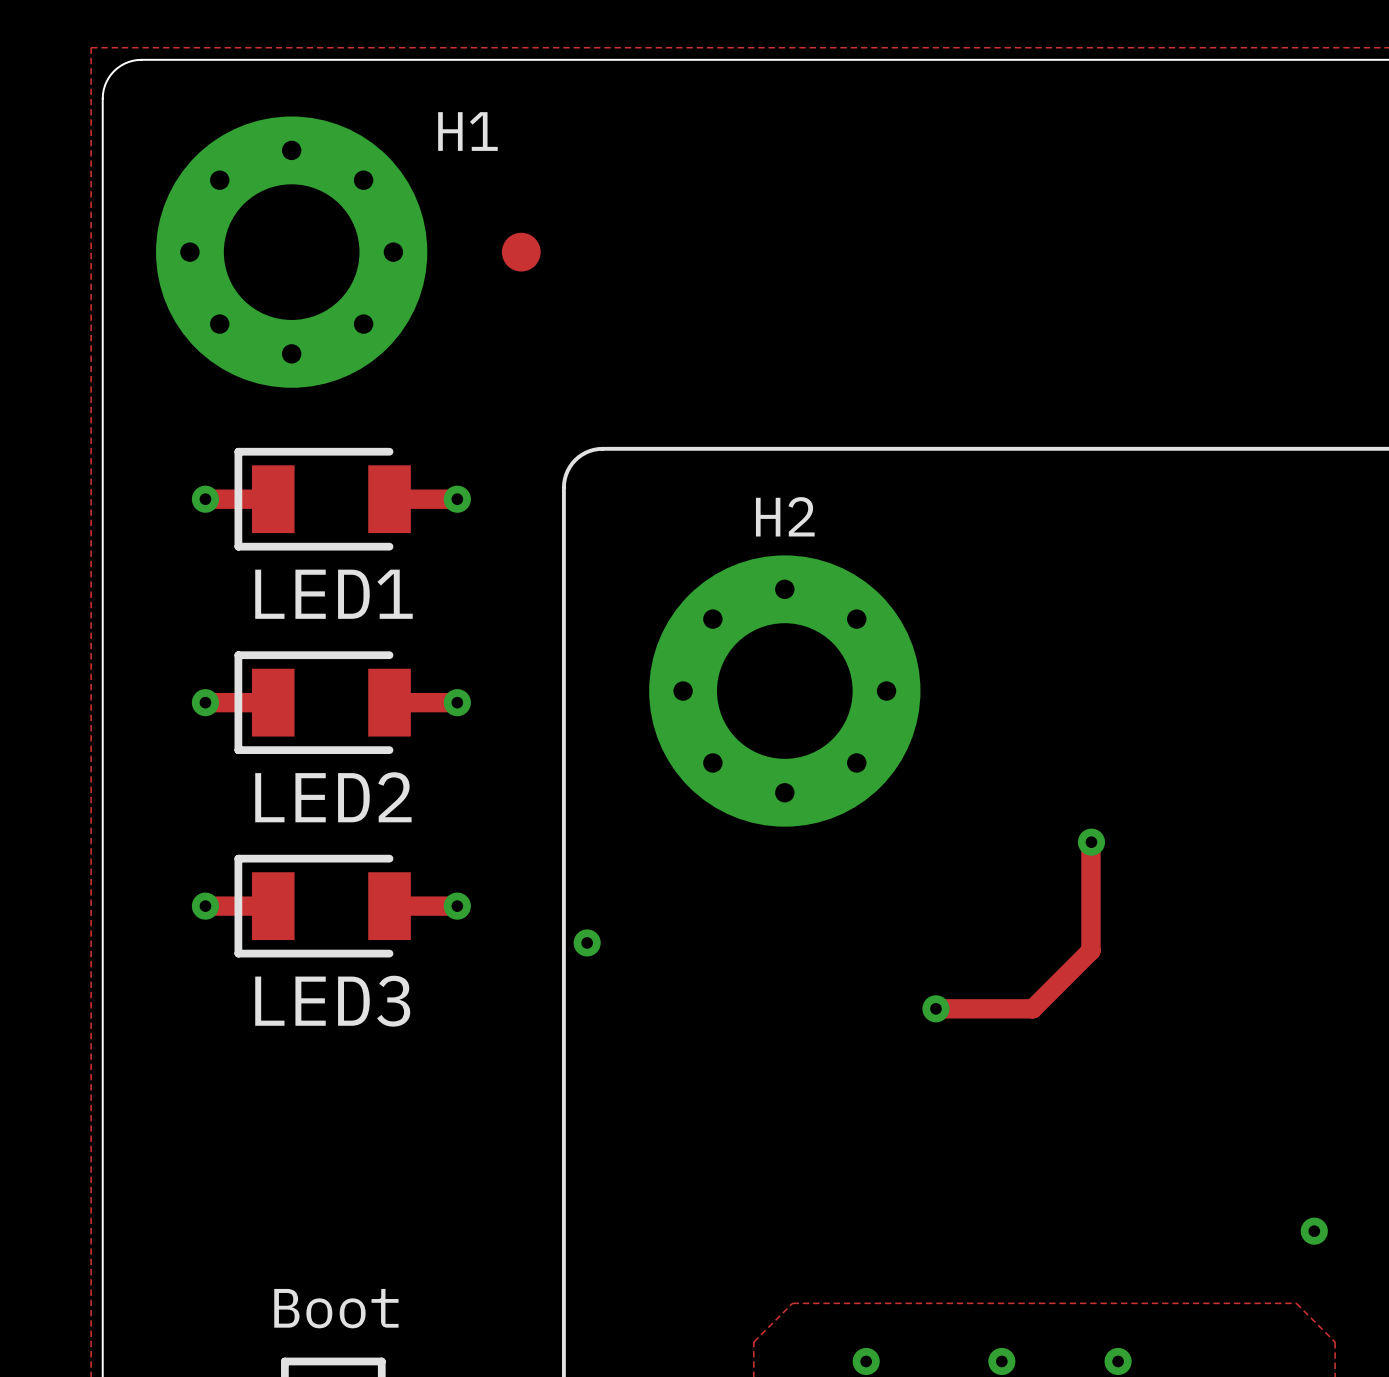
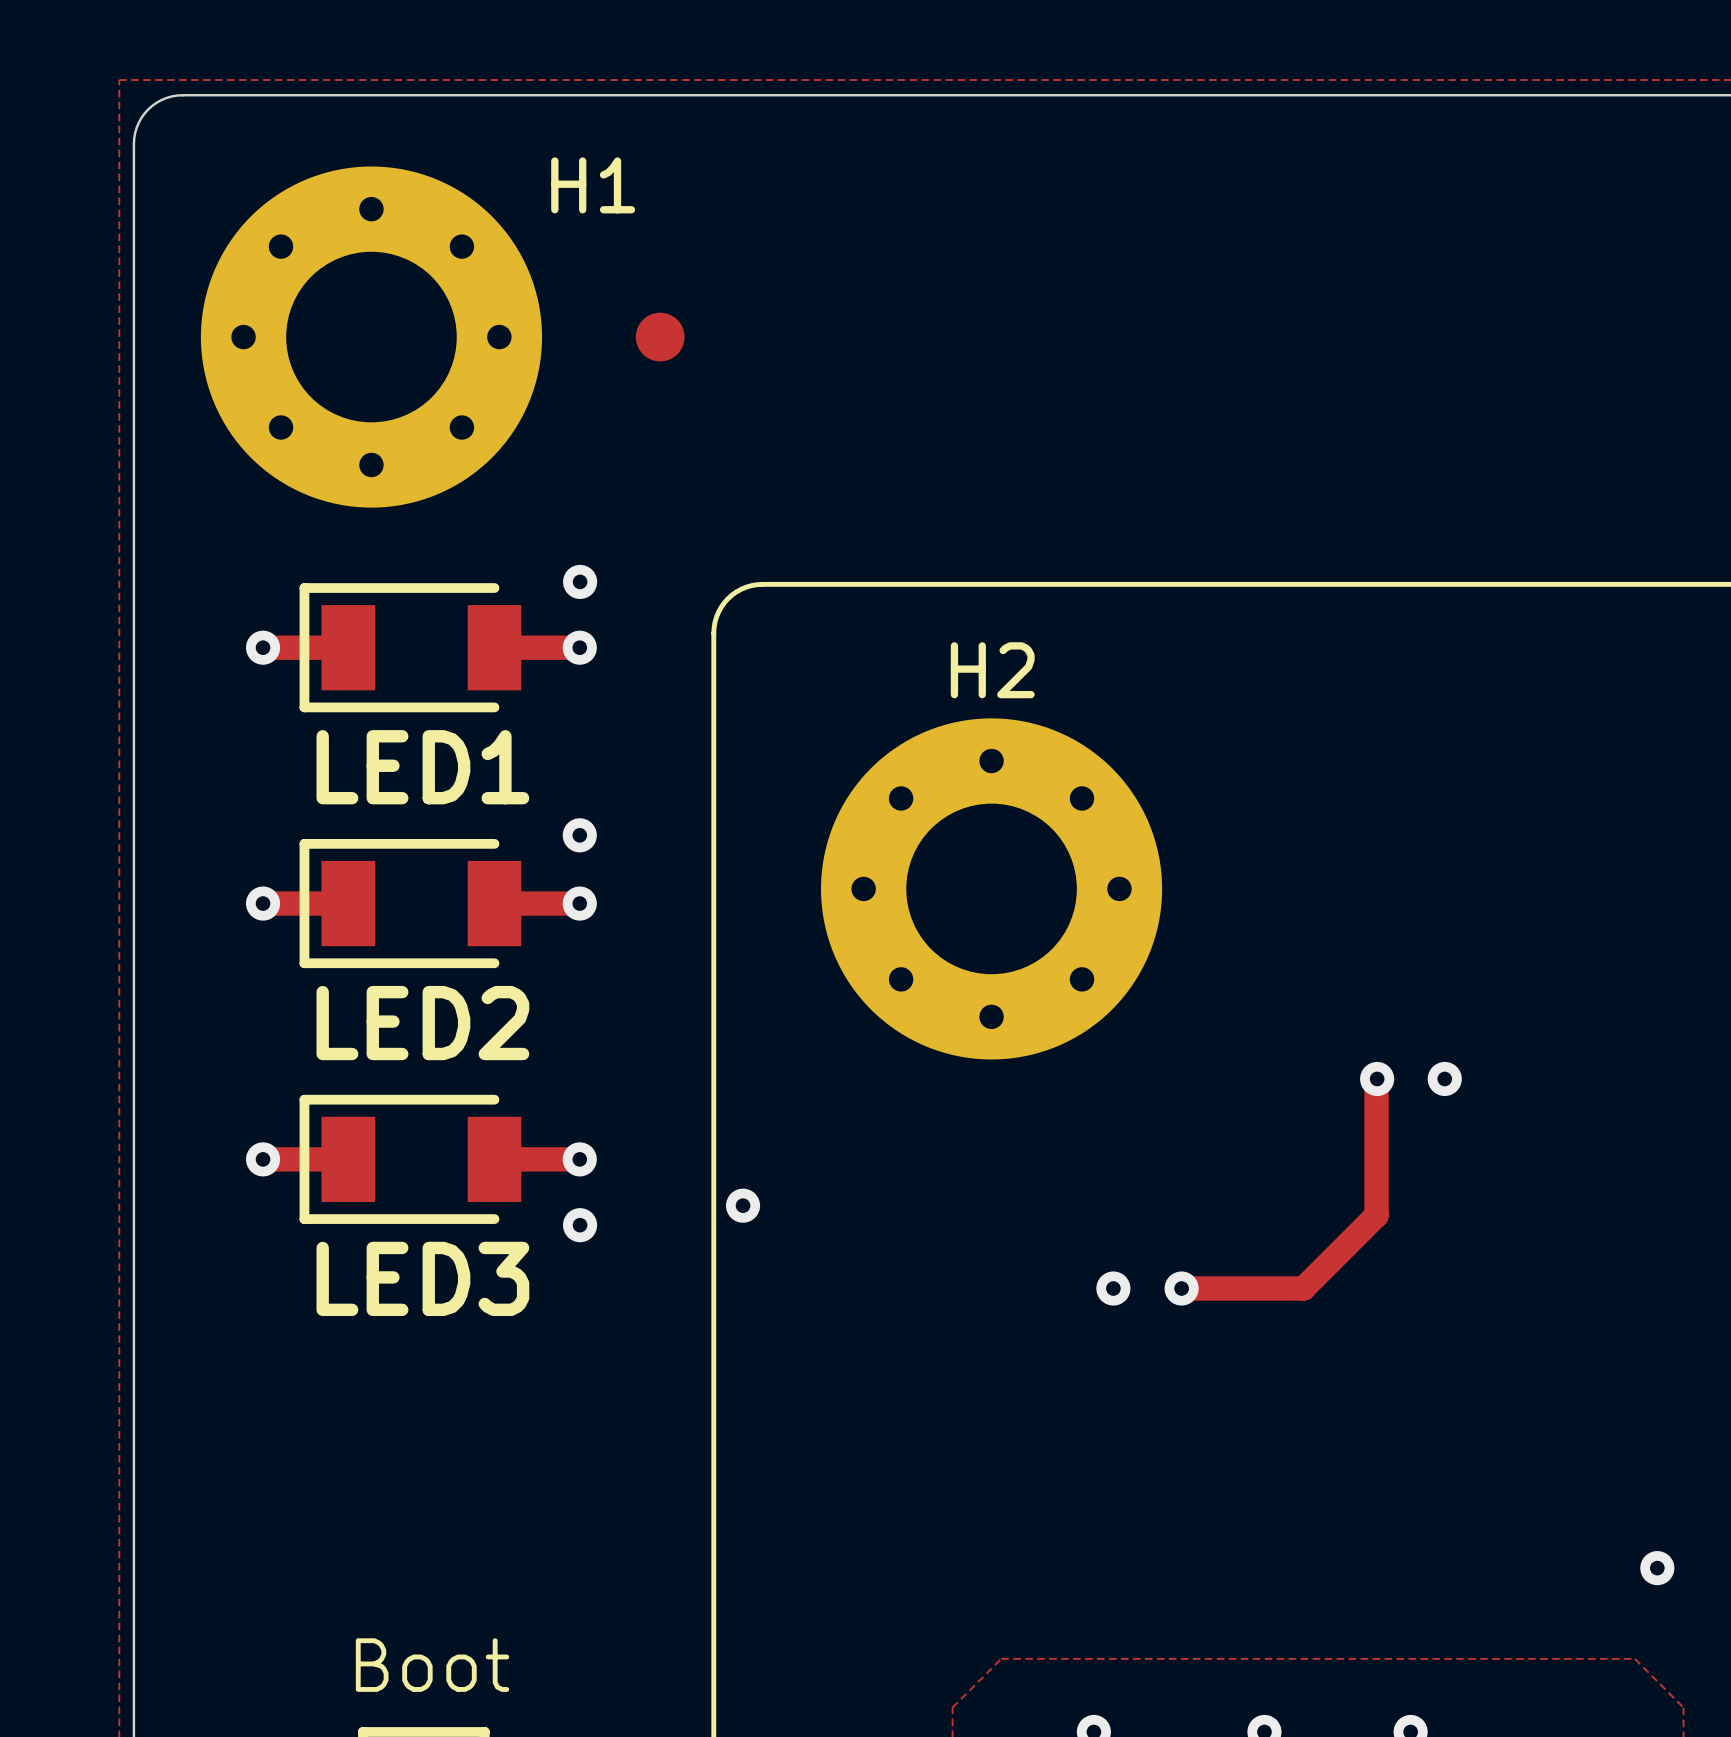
via: none -> (580, 581)
via: none -> (579, 835)
via: none -> (1444, 1078)
via: none -> (580, 1225)
via: none -> (1113, 1288)

